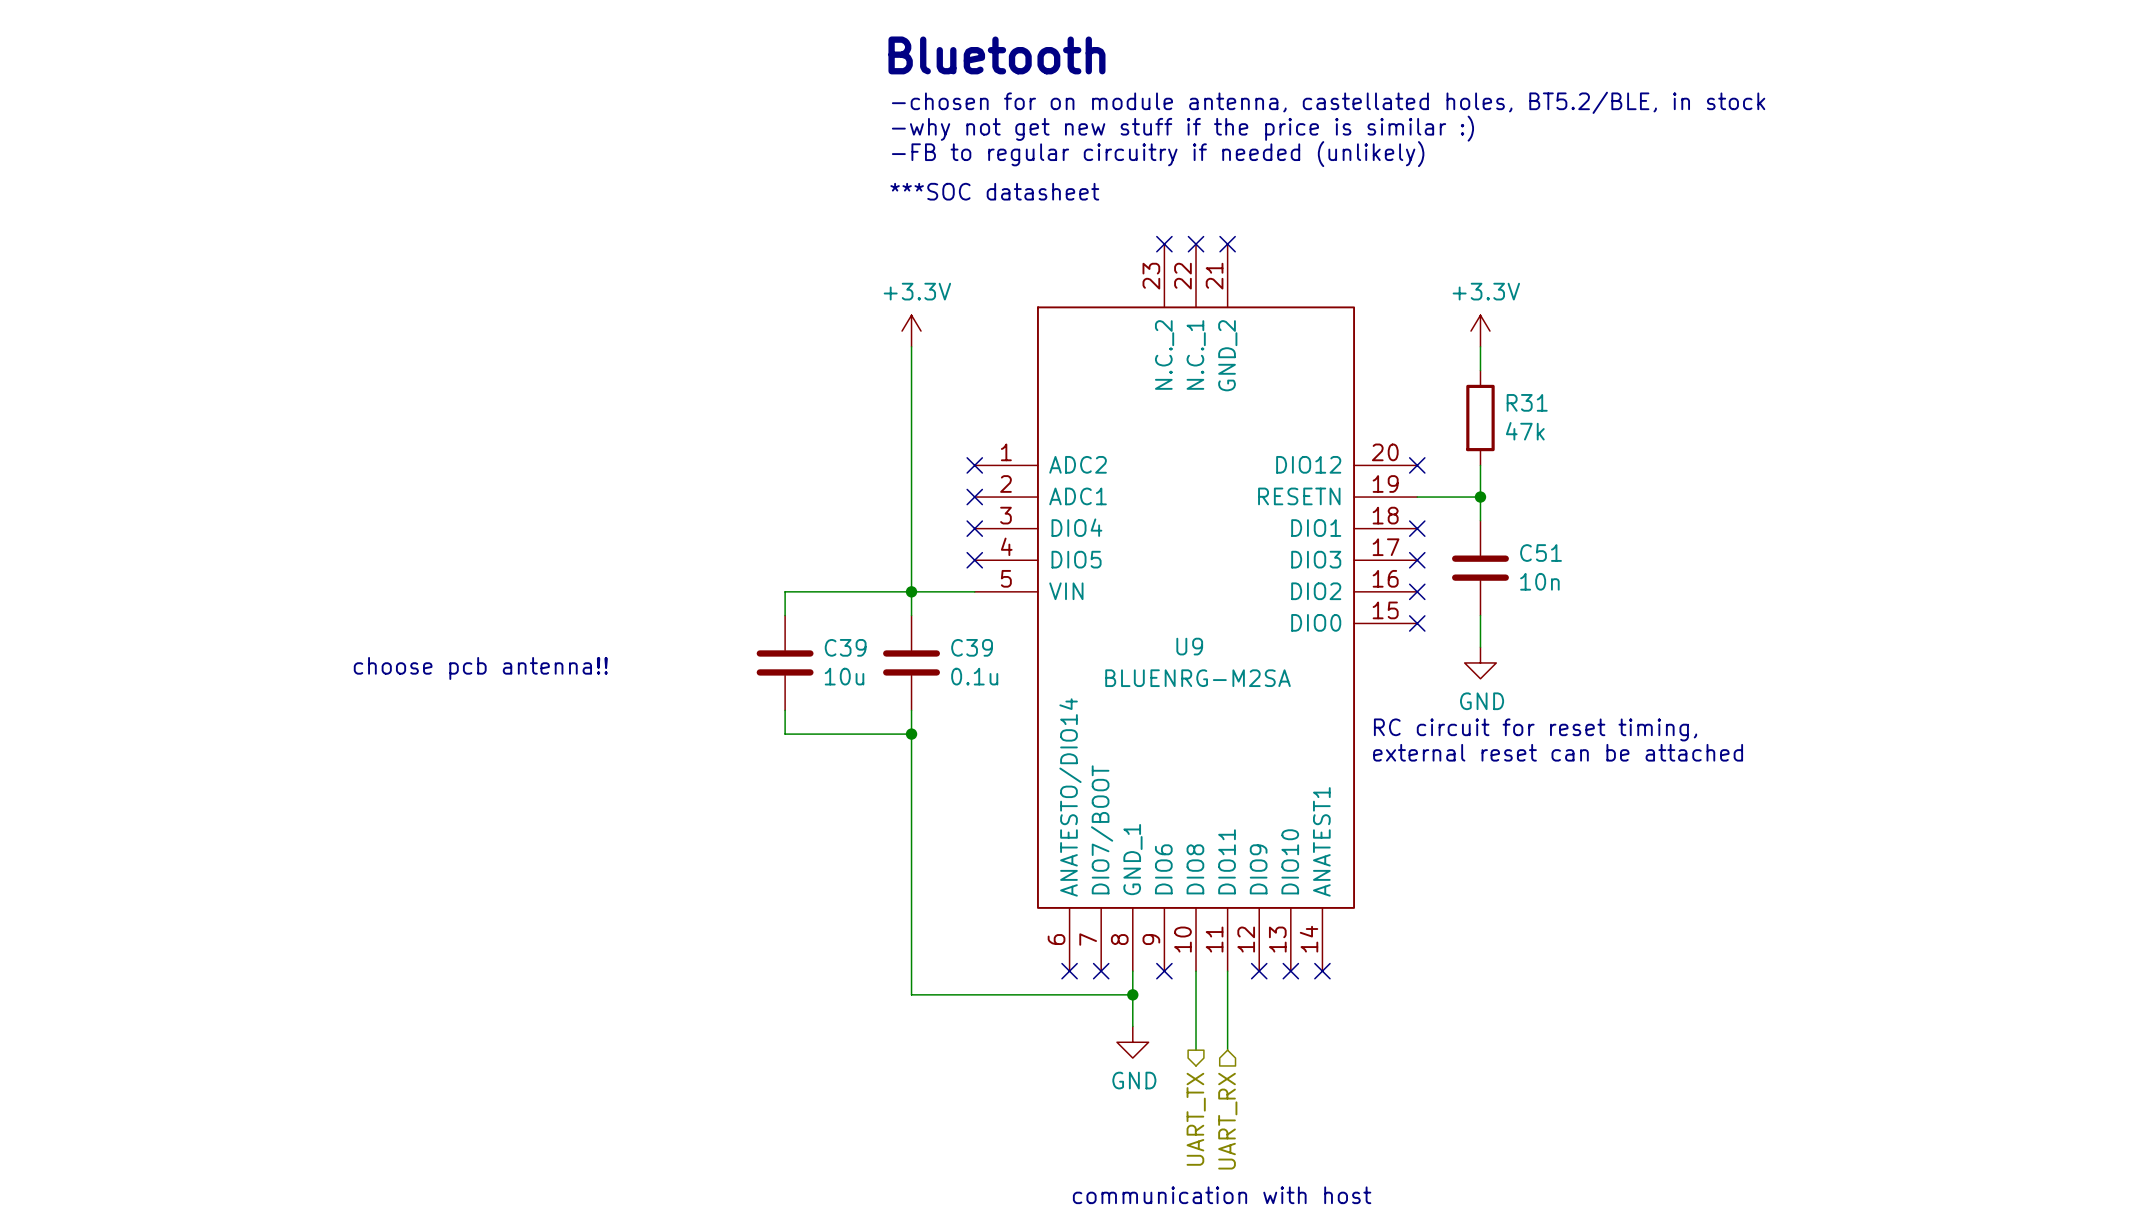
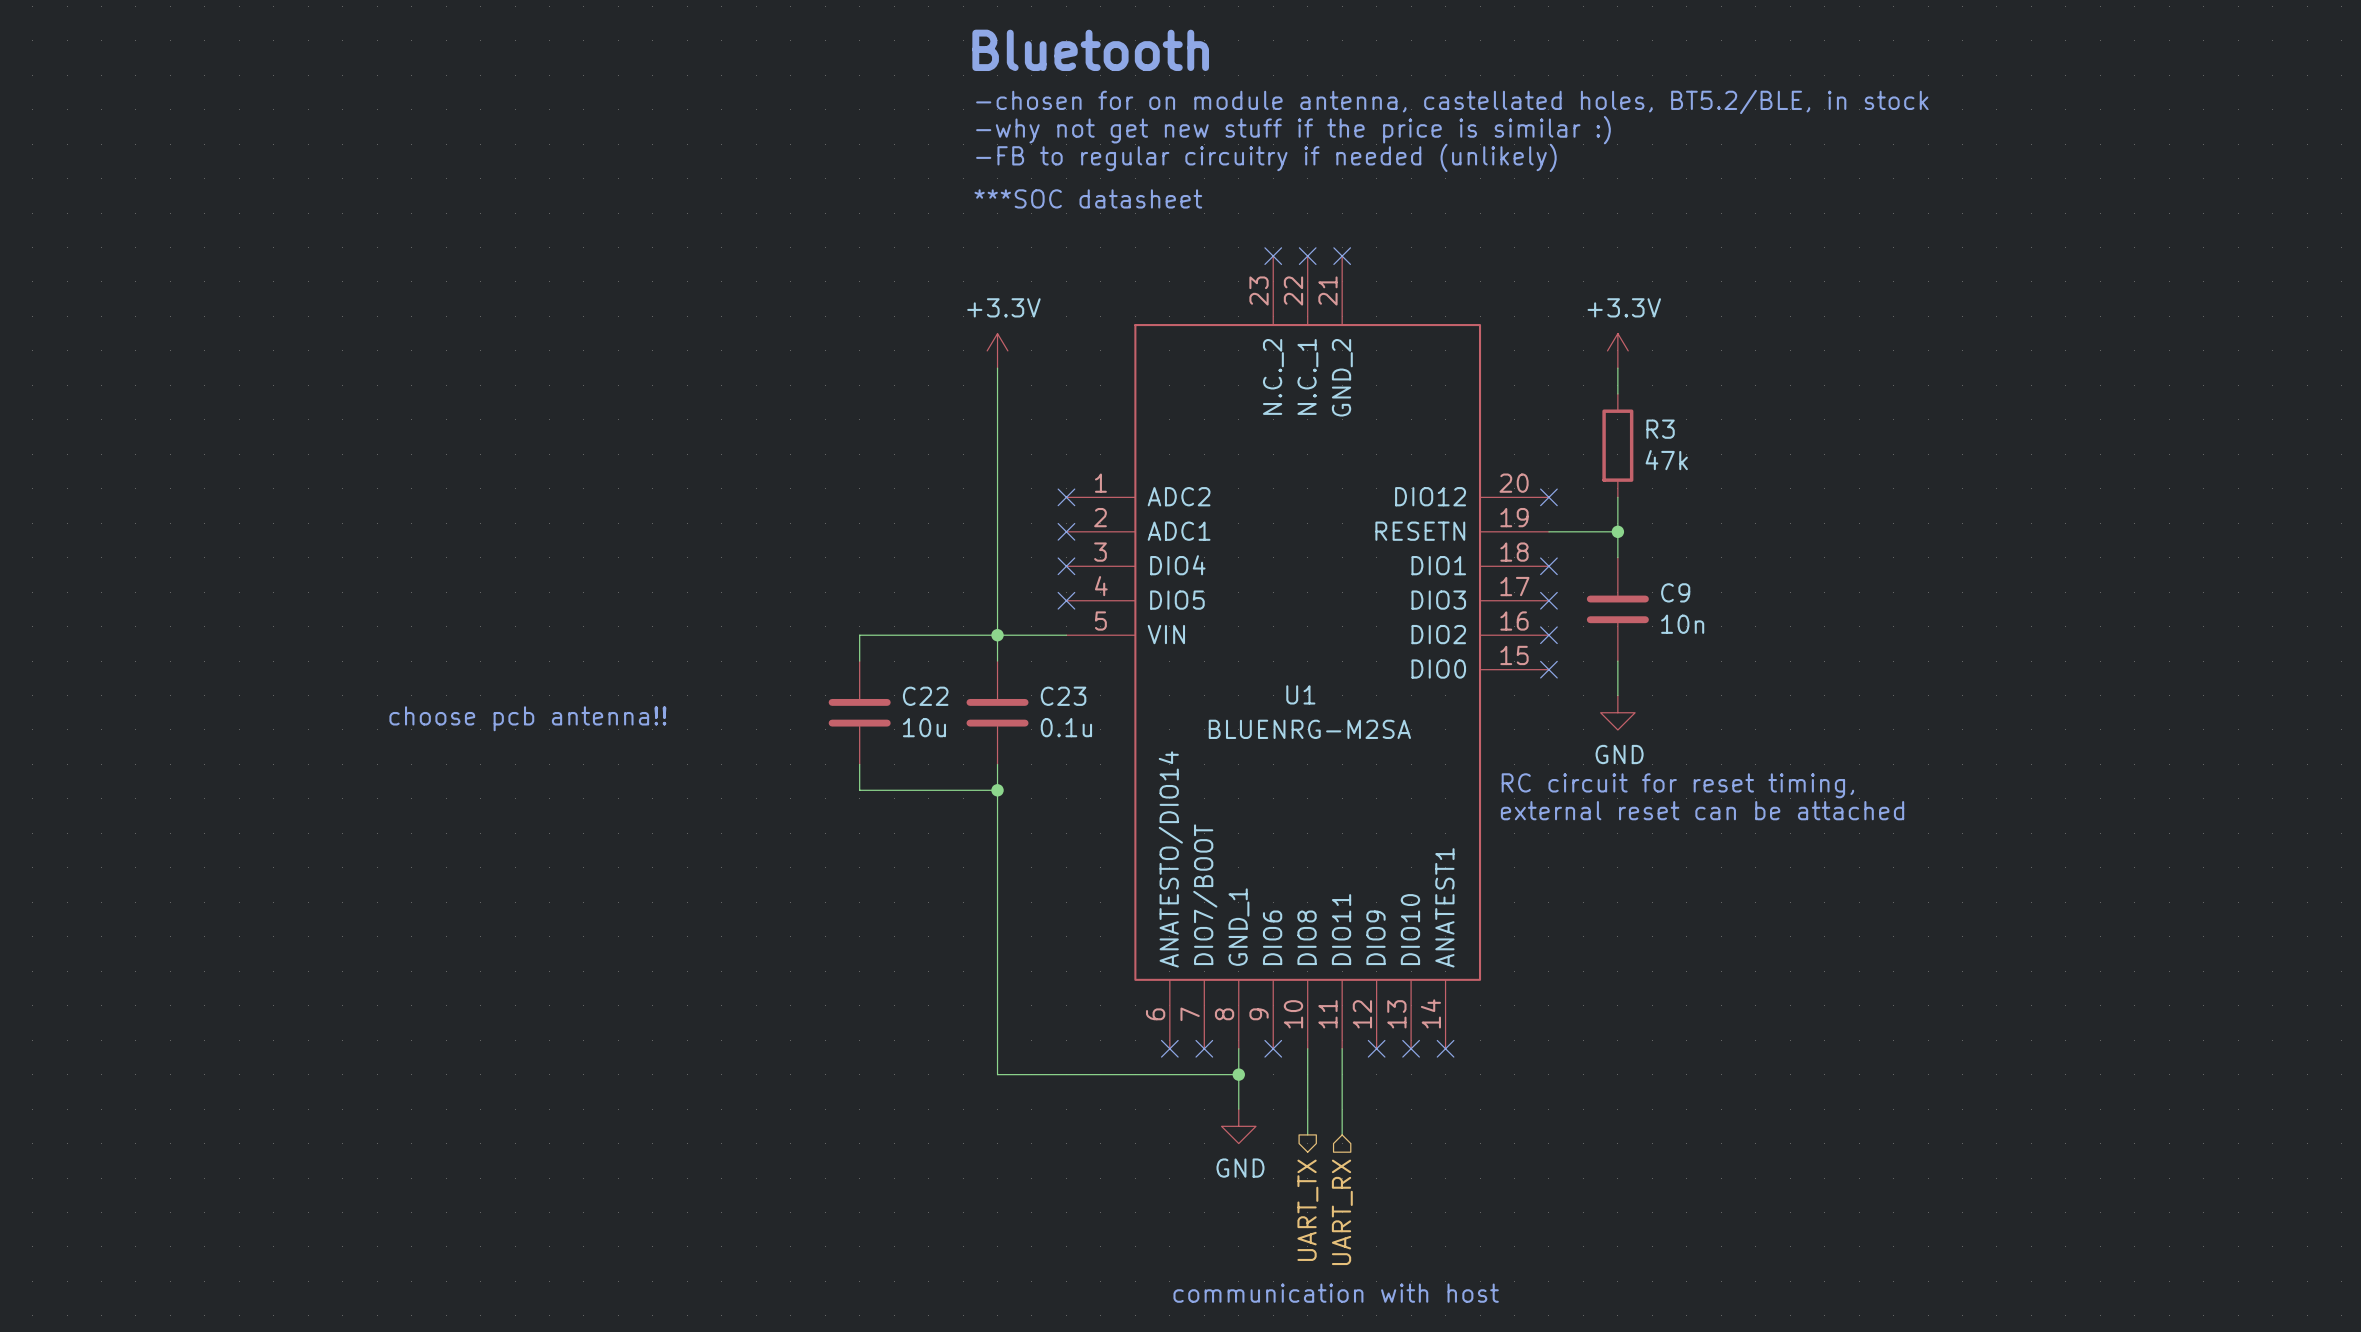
R31 name: R31 (1527, 402) -> R3 (1660, 429)
C51 name: C51 (1541, 553) -> C9 (1675, 592)
U9 name: U9 (1189, 646) -> U1 (1300, 694)
C39 name: C39 (845, 647) -> C22 (925, 696)
C39 name: C39 (972, 647) -> C23 (1063, 696)

